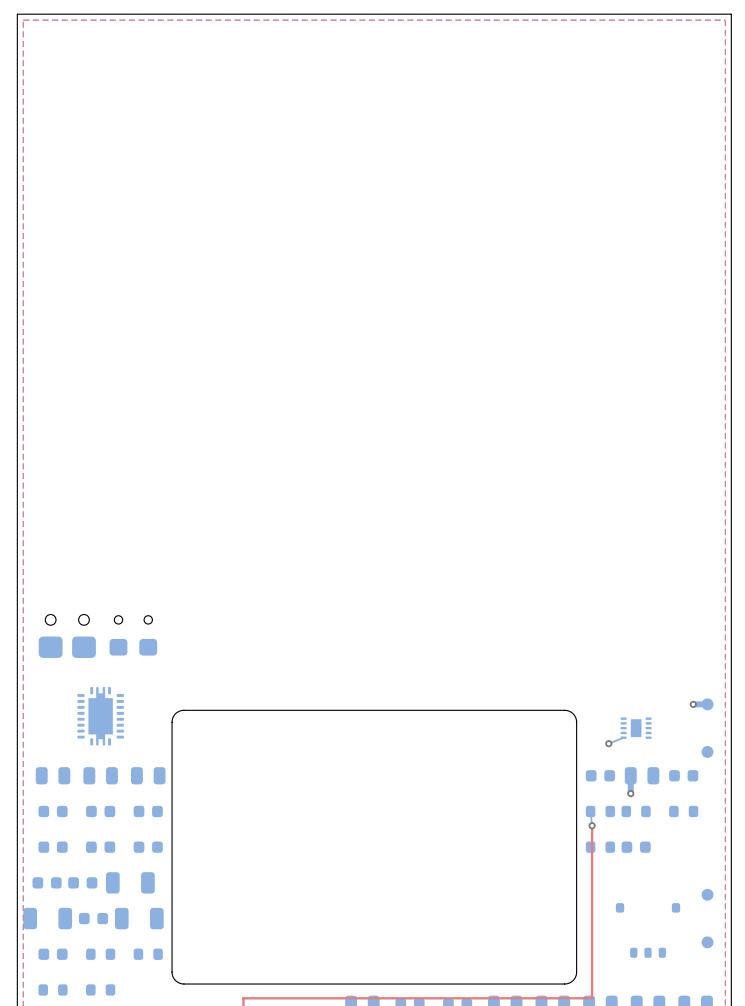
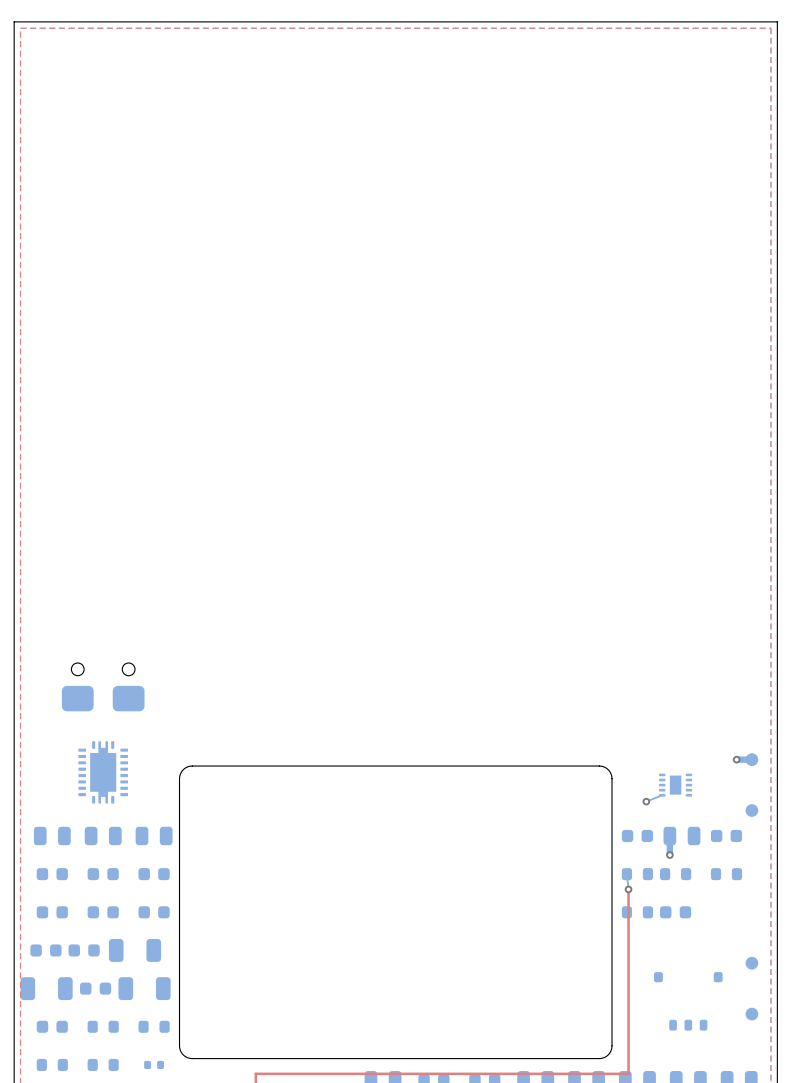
part footprint: [38, 614, 158, 658] -> [61, 662, 145, 712]
part: none -> (154, 1064)

